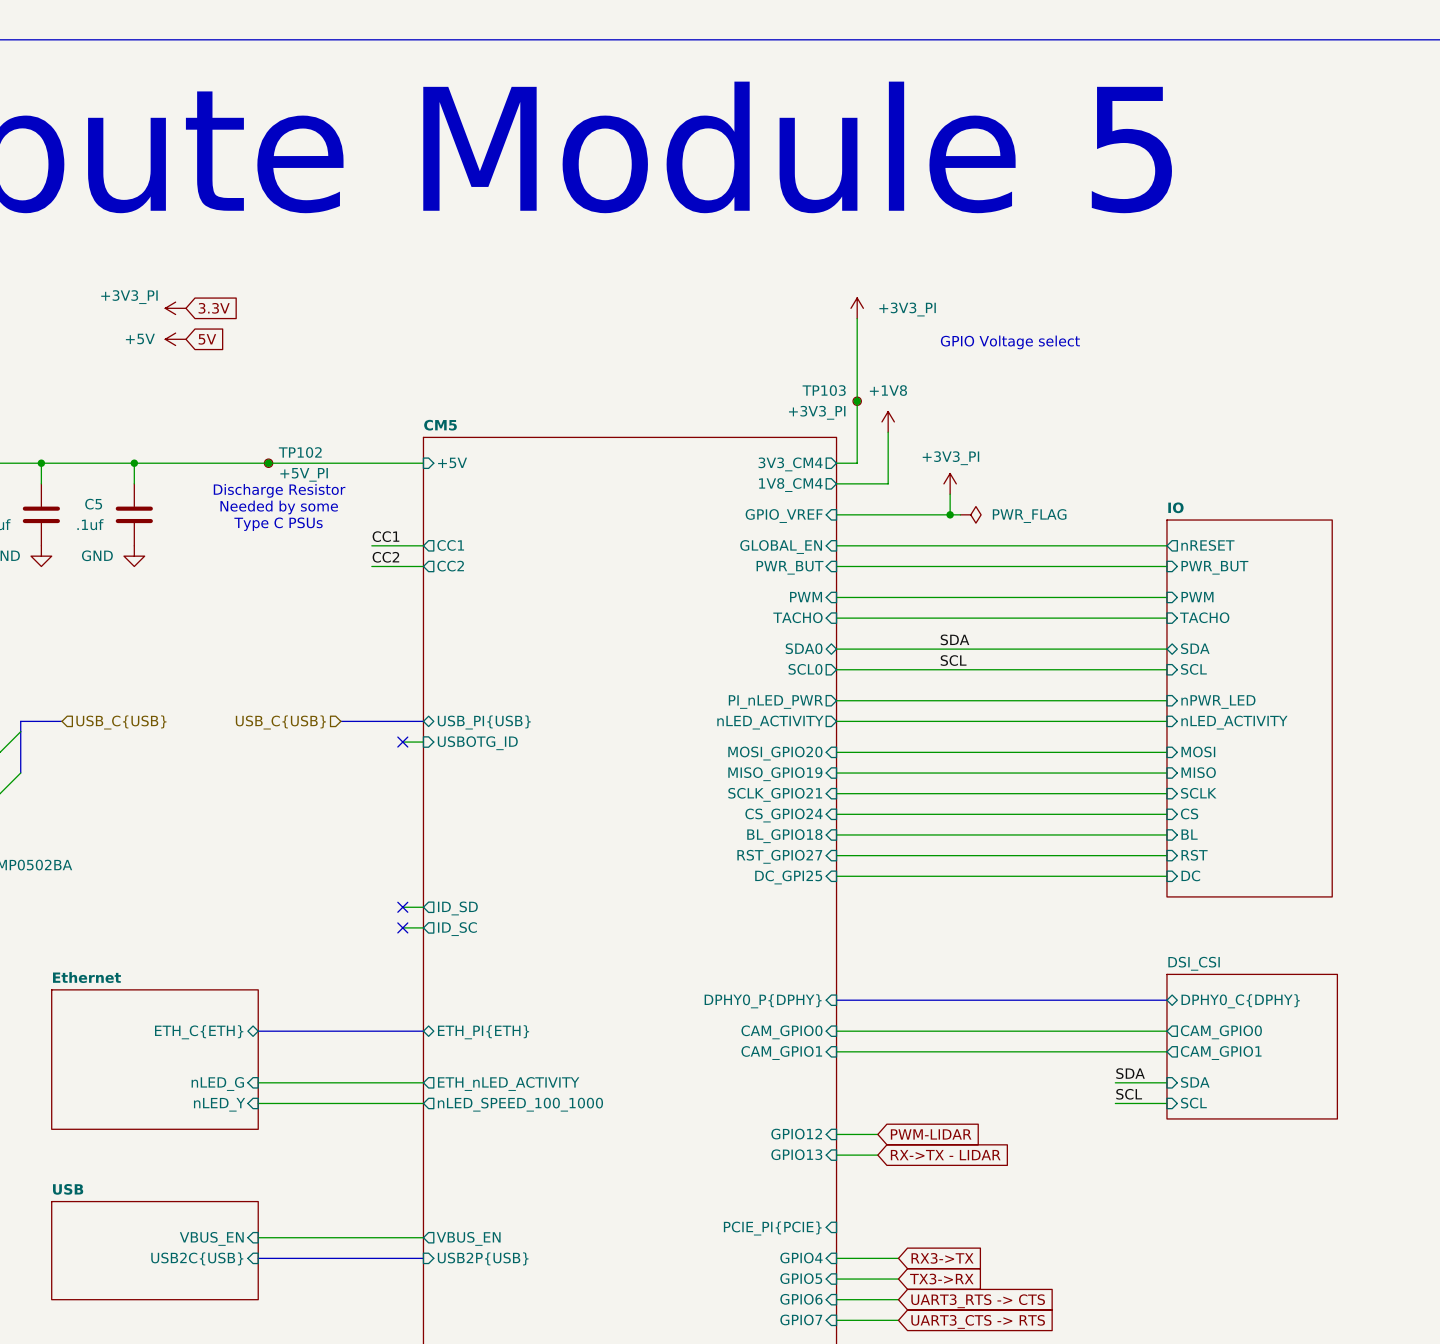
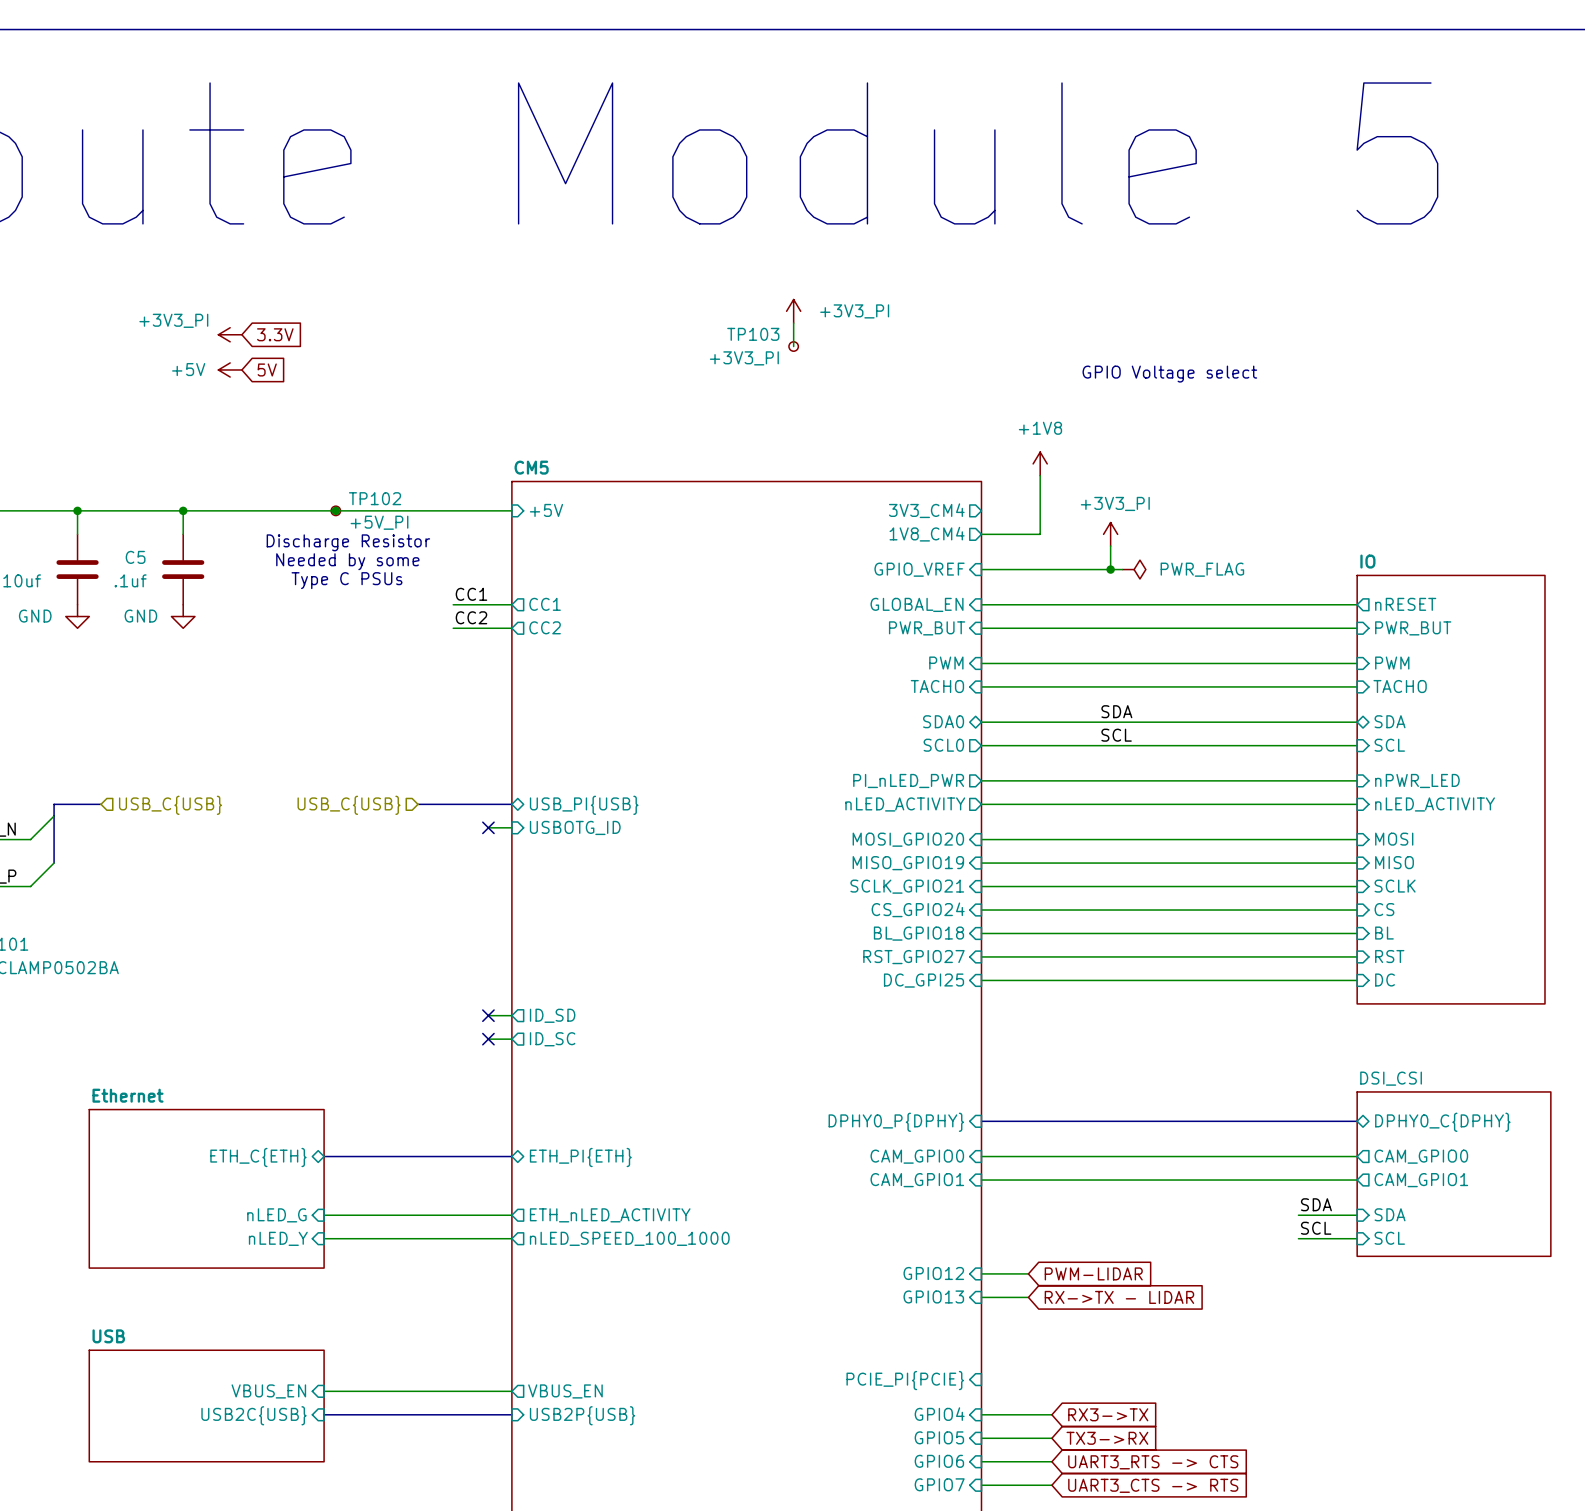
wire: none -> (793, 323) (793, 346)
power symbol position: +3V3_PI (857, 308) -> +3V3_PI (793, 311)
wire: (857, 318) (857, 463) (836, 463) -> none
junction: (857, 401) -> none
TP103 position: (857, 401) -> (793, 346)

